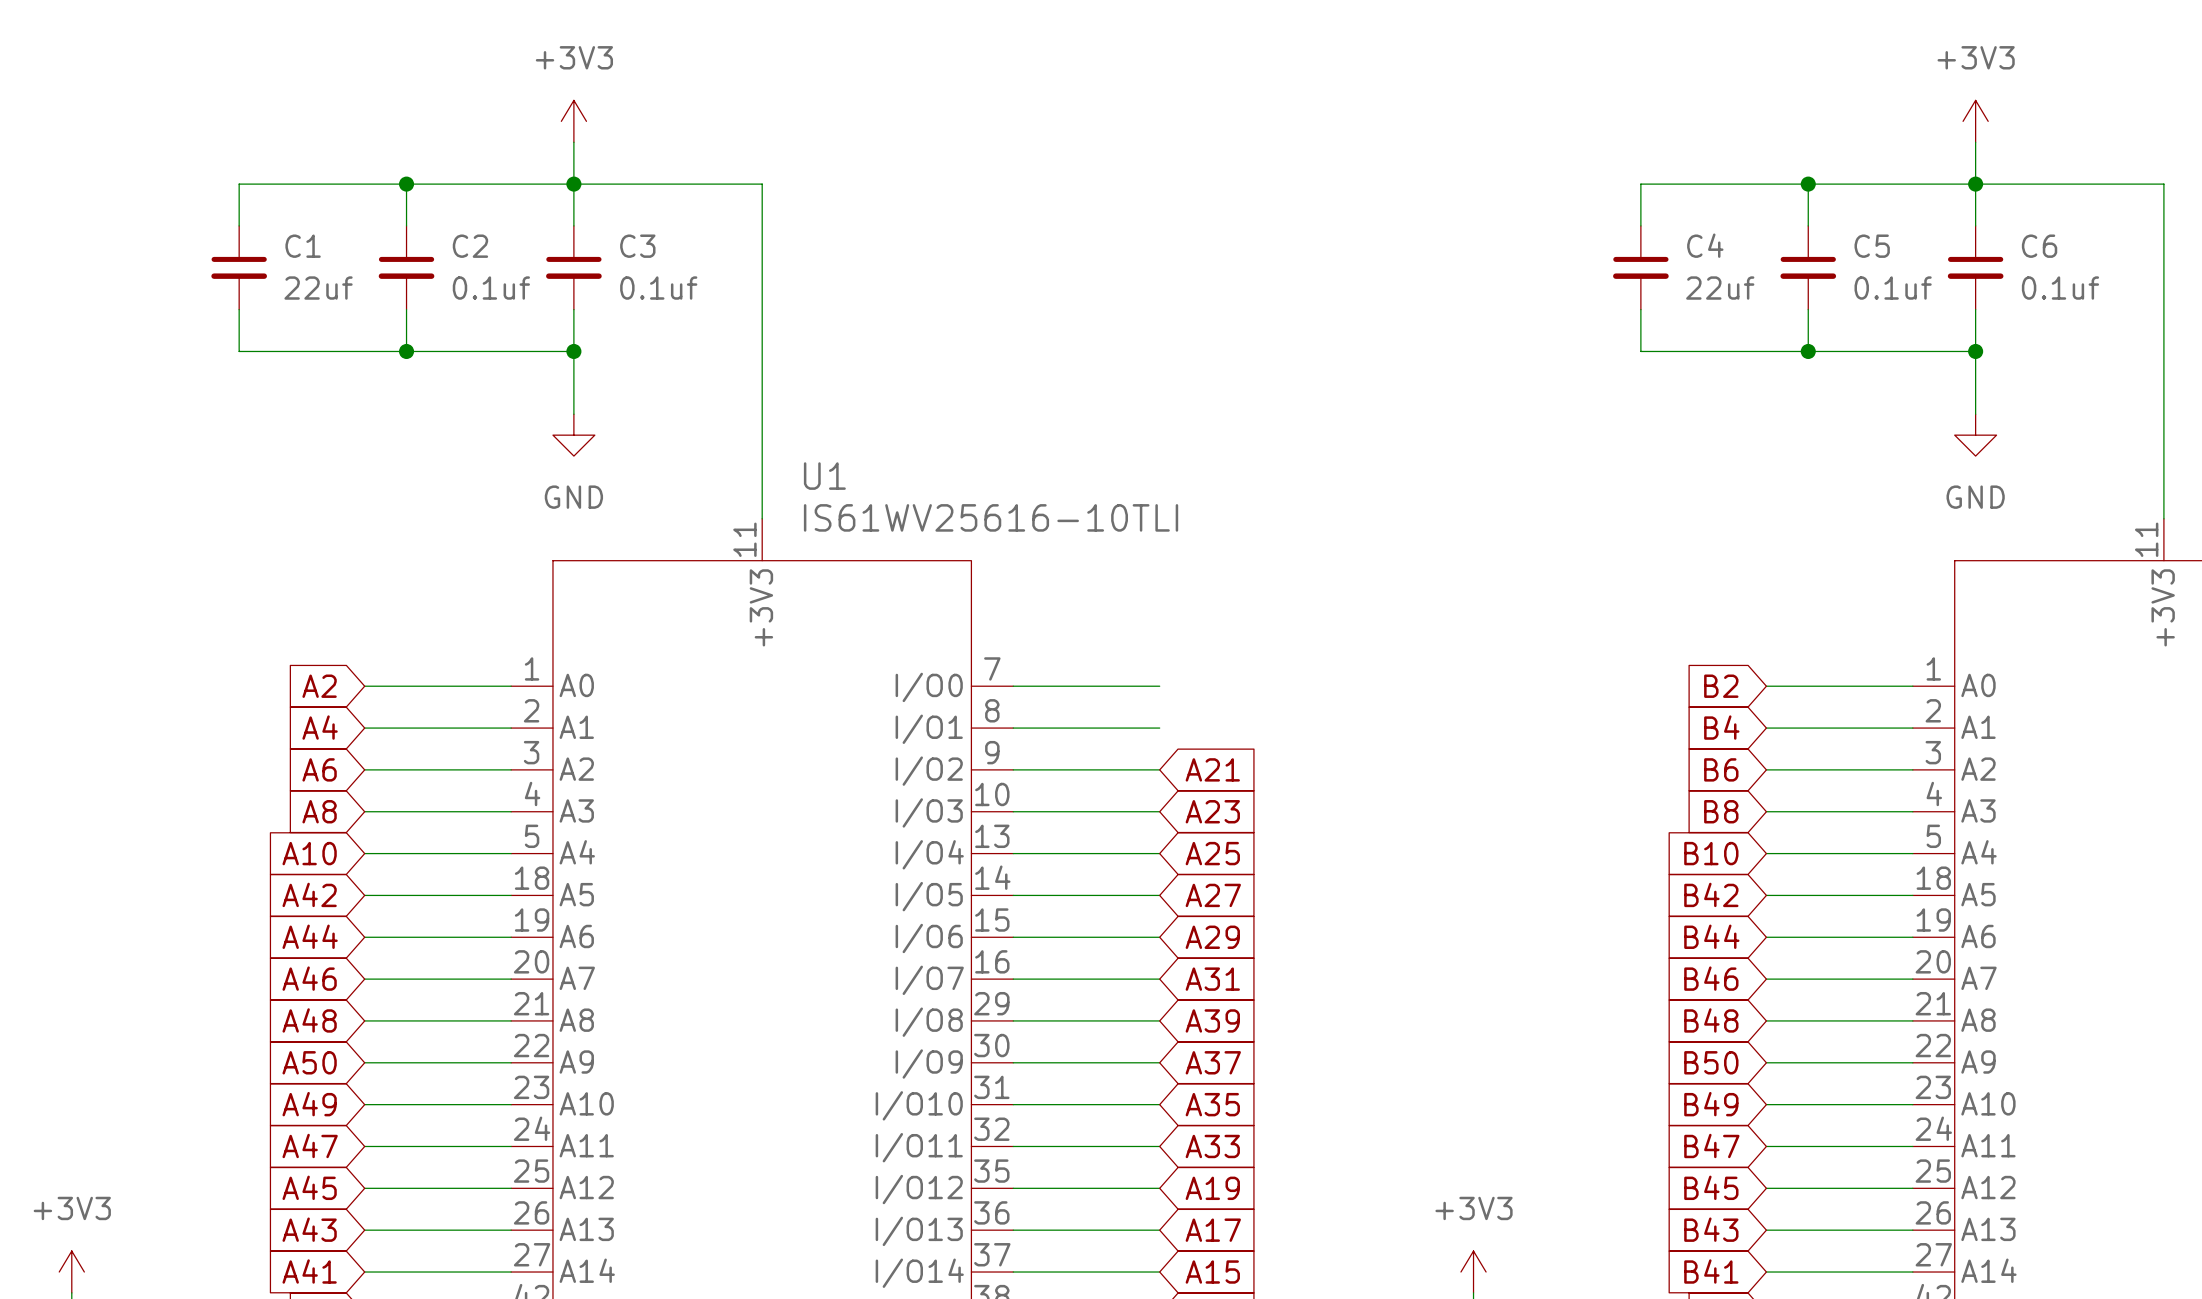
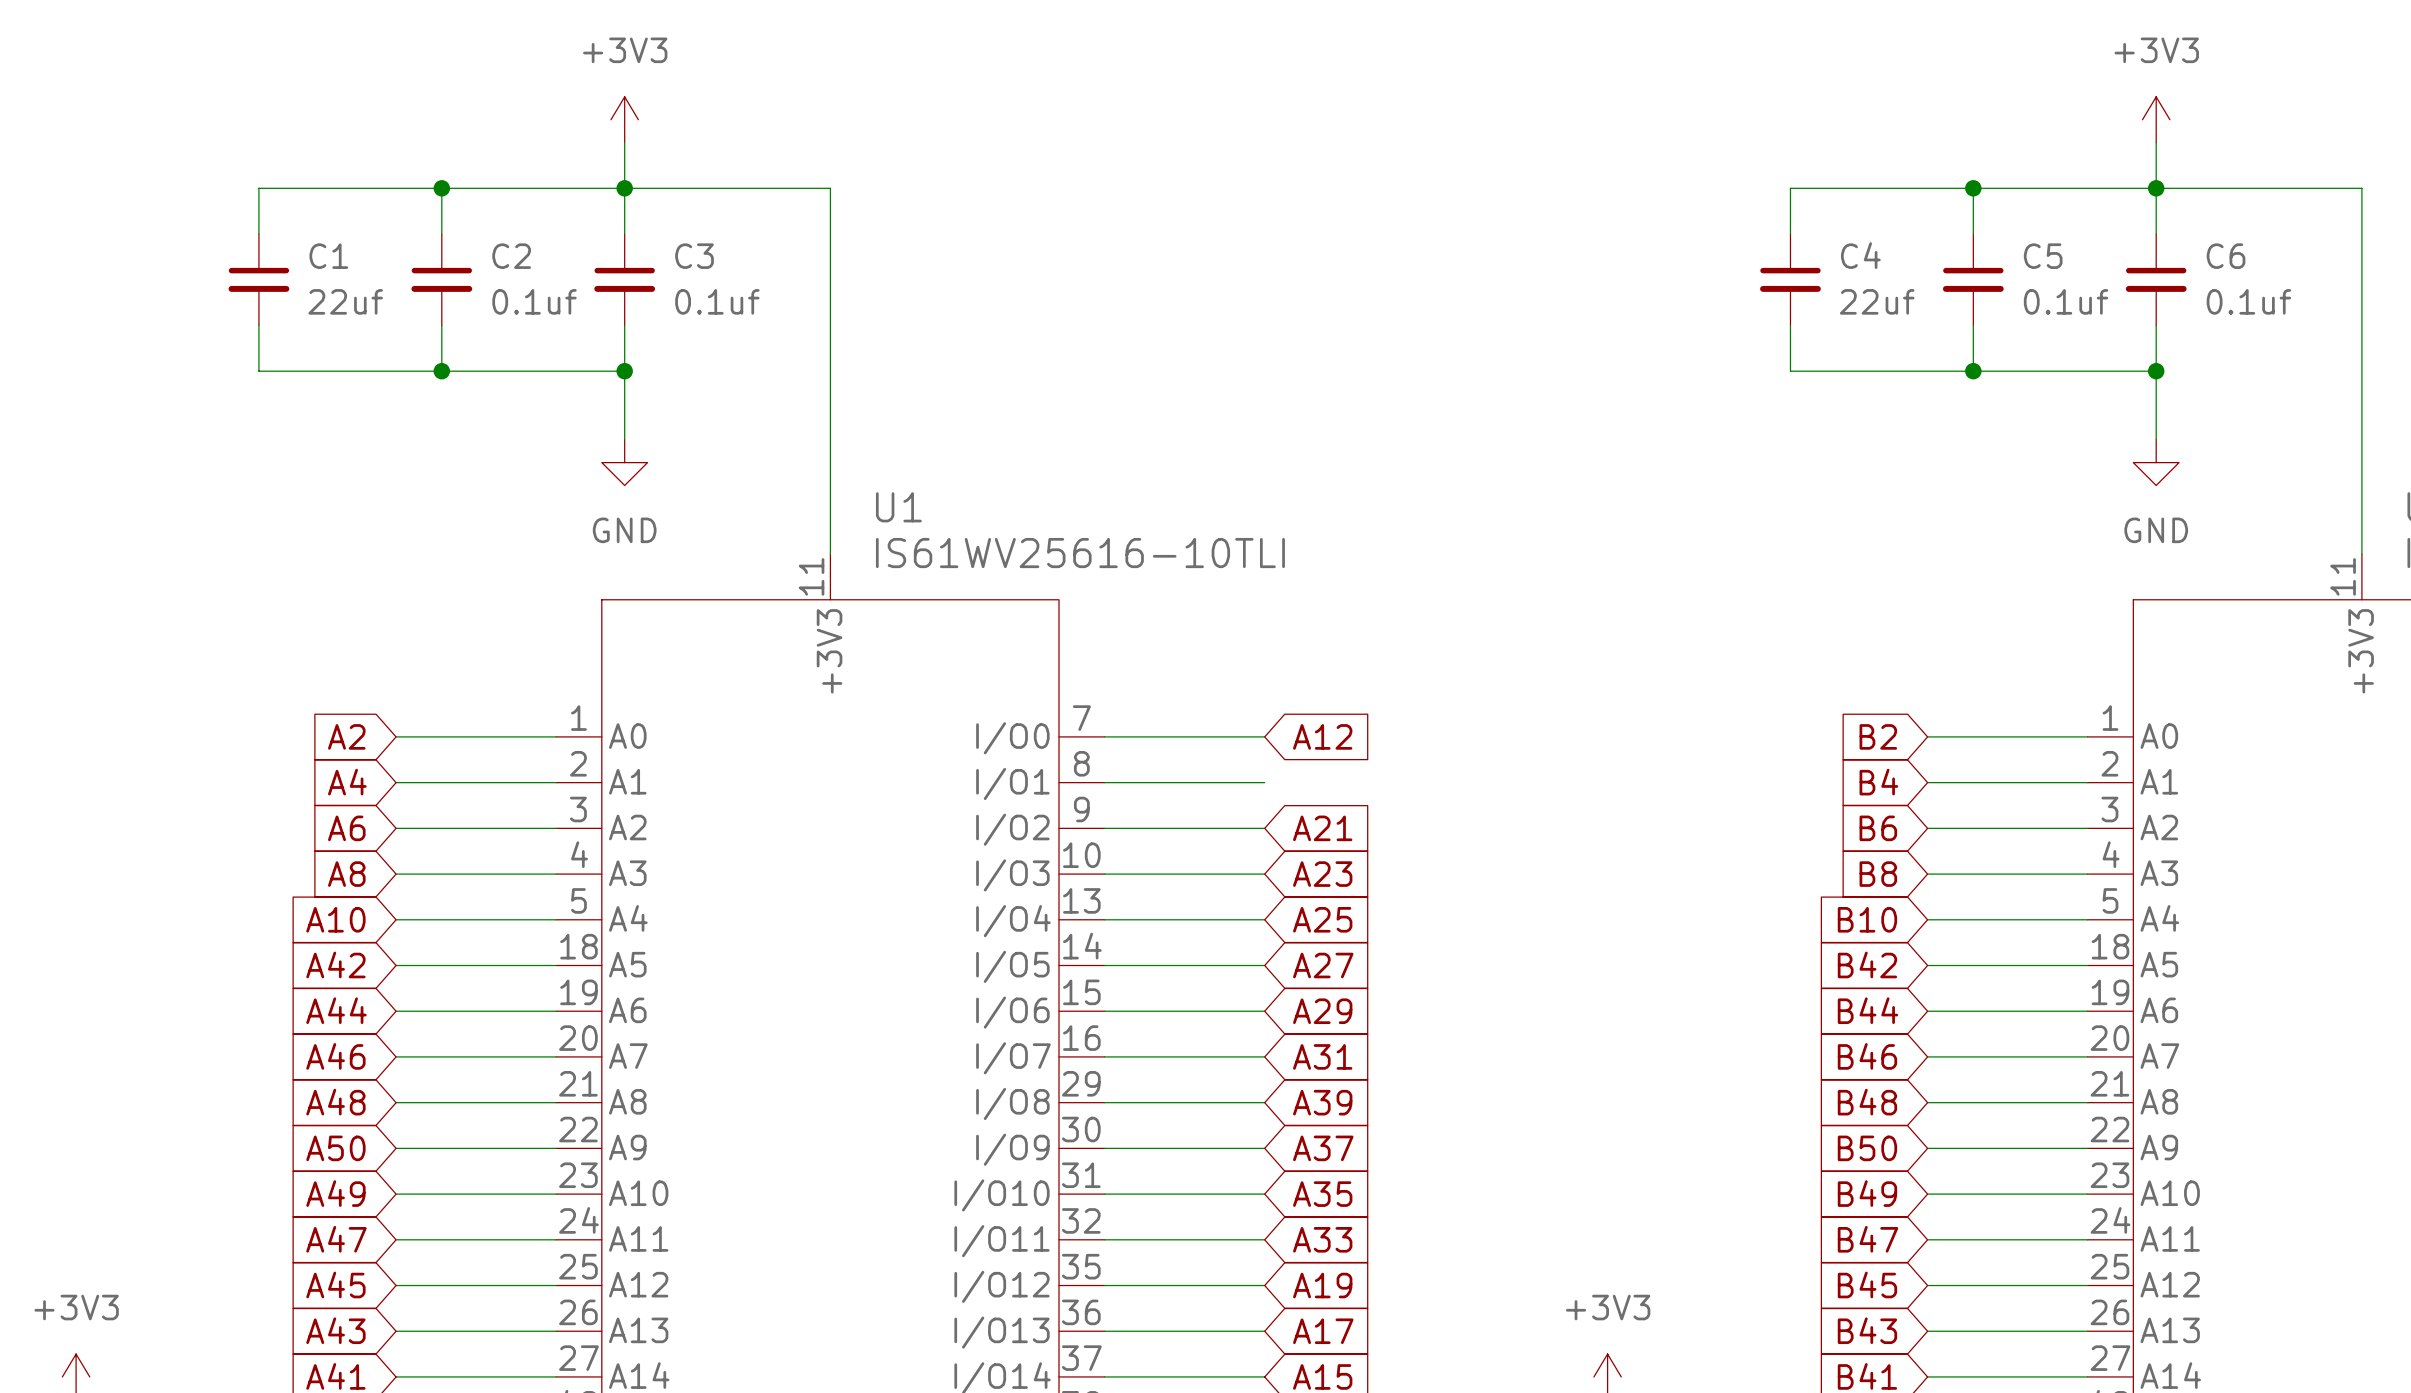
global label: none -> A12 (1322, 736)

